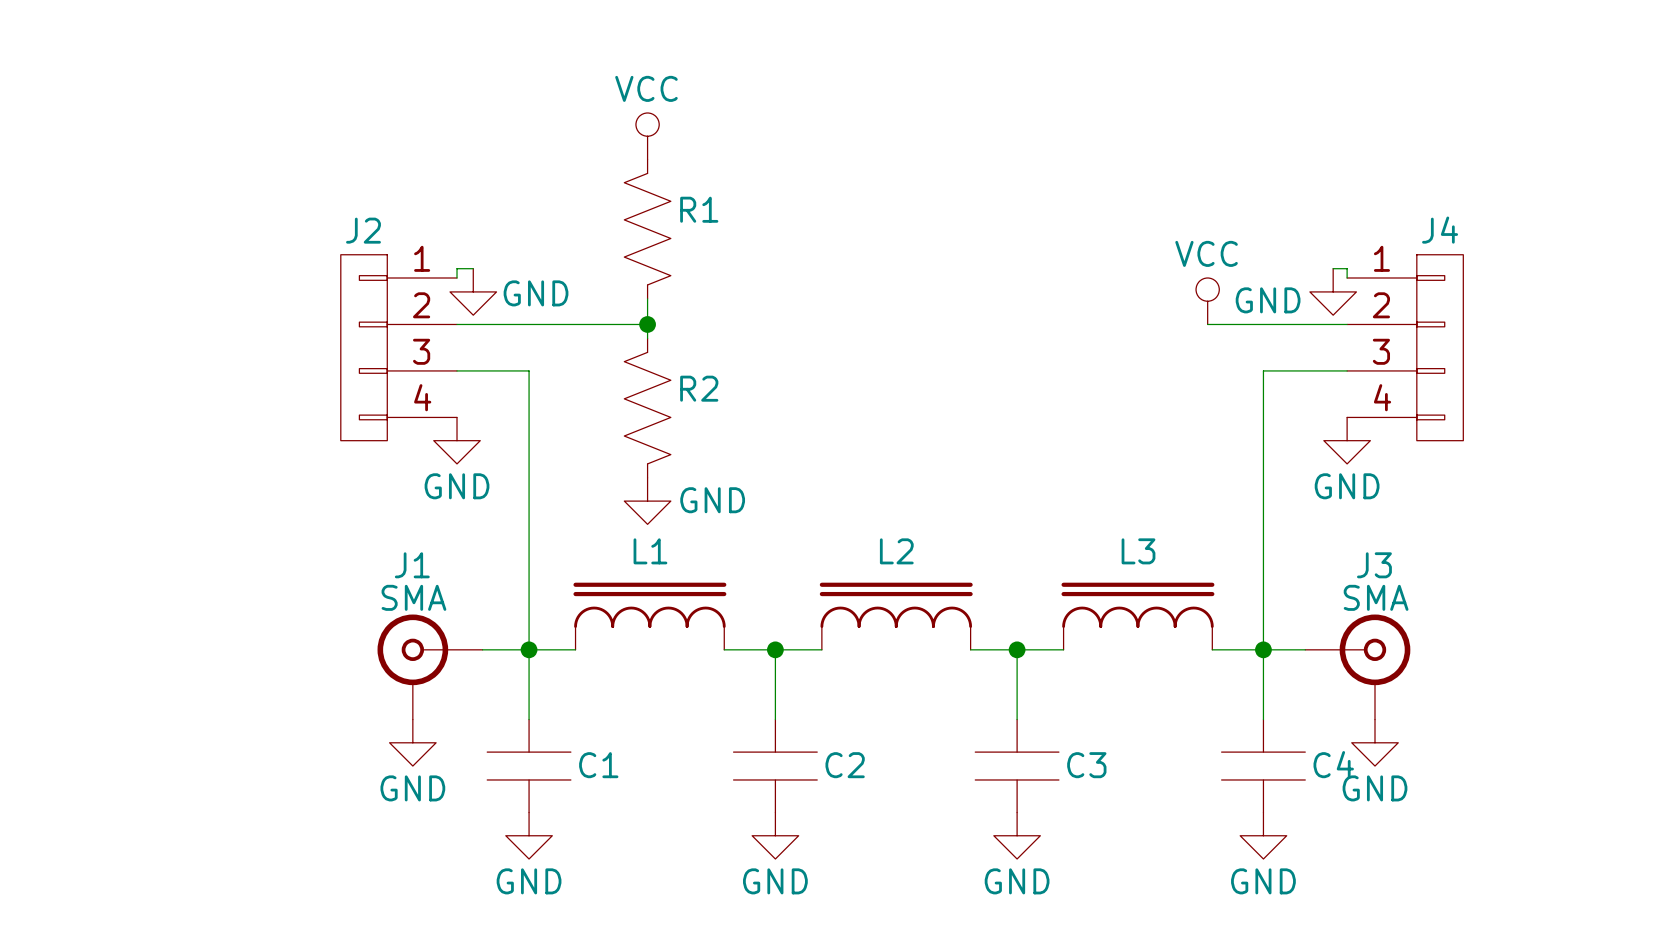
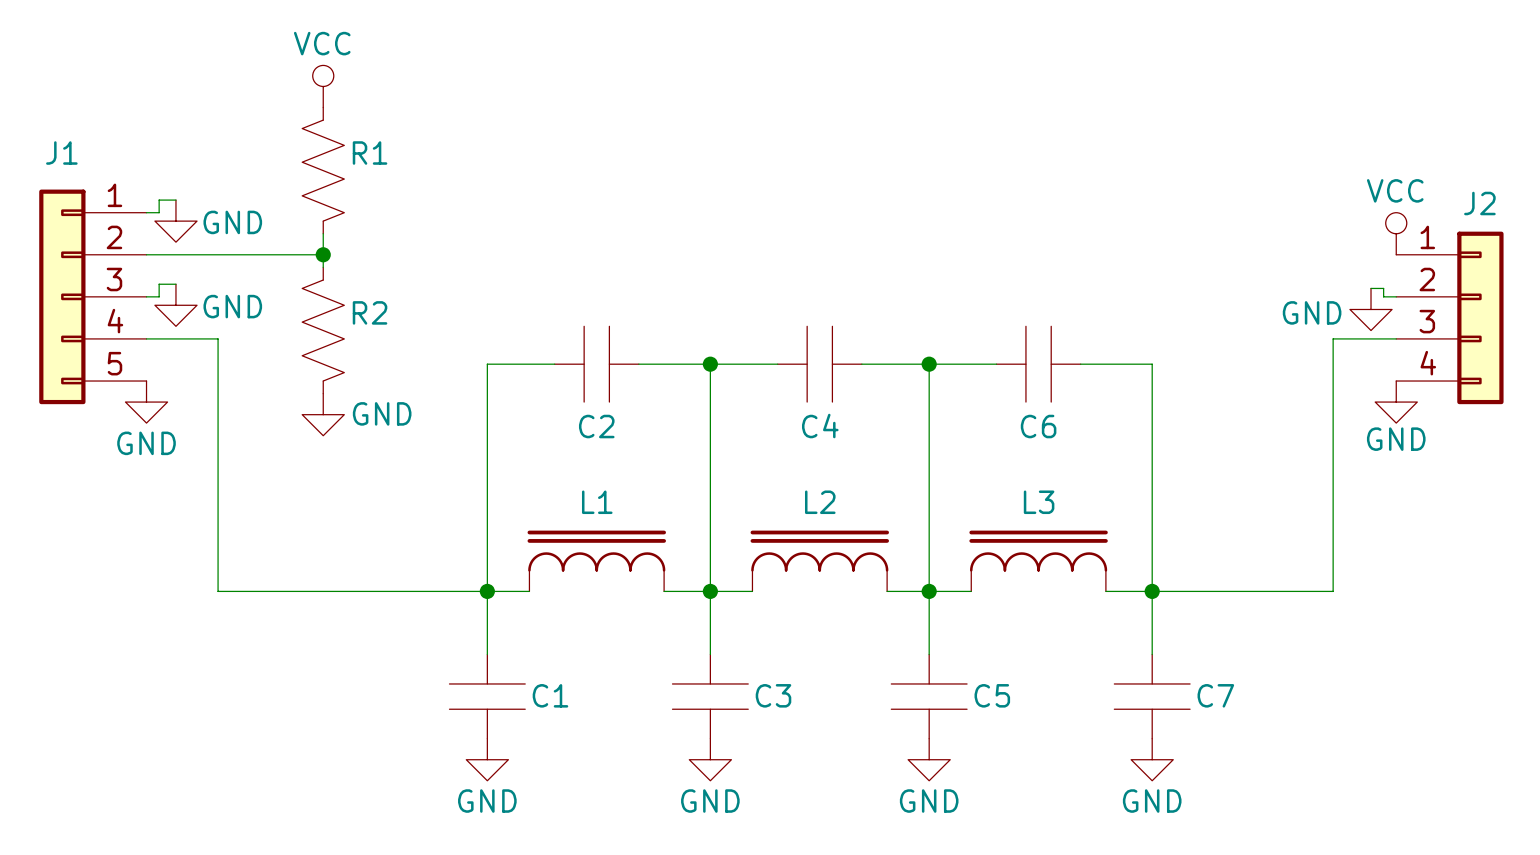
power symbol position: VCC (647, 136) -> VCC (323, 86)
wire: none -> (175, 200) (159, 200) (159, 212) (146, 212)
R1 position: (647, 229) -> (323, 170)
J2 name position: J2 (363, 230) -> J2 (1479, 203)
power symbol: none -> GND (175, 221)
J2 symbol: [340, 254, 458, 441] -> [1396, 231, 1504, 405]
wire: none -> (323, 233) (323, 267)
wire: (473, 268) (457, 268) (457, 277) -> none
wire: (1333, 268) (1347, 268) (1347, 277) -> none
wire: none -> (146, 254) (323, 254)
junction: none -> (323, 254)
power symbol: GND (473, 291) -> none
power symbol: GND (1333, 291) -> none
wire: (647, 298) (647, 338) -> none
power symbol position: VCC (1207, 301) -> VCC (1396, 233)
wire: none -> (175, 284) (159, 284) (159, 296) (146, 296)
wire: none -> (1371, 288) (1383, 288) (1383, 296) (1396, 296)
wire: (457, 324) (647, 324) -> none
junction: (647, 324) -> none
wire: (1207, 324) (1347, 324) -> none
power symbol: none -> GND (175, 305)
power symbol: none -> GND (1371, 309)
J4: (1405, 347) -> none
wire: none -> (146, 338) (218, 338) (218, 591) (445, 591)
wire: (457, 370) (529, 370) (529, 398) -> (554, 364) (487, 364)
wire: (1347, 370) (1263, 370) (1263, 398) -> (1080, 364) (1152, 364)
wire: none -> (1396, 338) (1333, 338) (1333, 591) (1190, 591)
C2: none -> (596, 364)
wire: none -> (638, 364) (777, 364)
wire: none -> (710, 364) (710, 591)
junction: none -> (710, 364)
C4: none -> (819, 364)
wire: none -> (861, 364) (996, 364)
wire: none -> (929, 364) (929, 591)
junction: none -> (929, 364)
C6: none -> (1038, 364)
R2 position: (647, 408) -> (323, 330)
power symbol: none -> GND (146, 402)
power symbol: GND (457, 440) -> none
power symbol: GND (1347, 440) -> none
power symbol: none -> GND (1396, 402)
power symbol: none -> GND (323, 414)
power symbol: GND (647, 501) -> none
J1 name position: J1 (412, 565) -> J1 (61, 153)
J1 value: SMA (413, 597) -> none
J1 symbol: [377, 614, 483, 720] -> [39, 189, 147, 405]
J3: SMA (1357, 667) -> none
power symbol: GND (412, 742) -> none
power symbol: GND (1374, 742) -> none
C4 name: C4 (1333, 764) -> C7 (1215, 695)
C2 name: C2 (845, 765) -> C3 (773, 695)
C3 name: C3 (1086, 765) -> C5 (992, 695)

